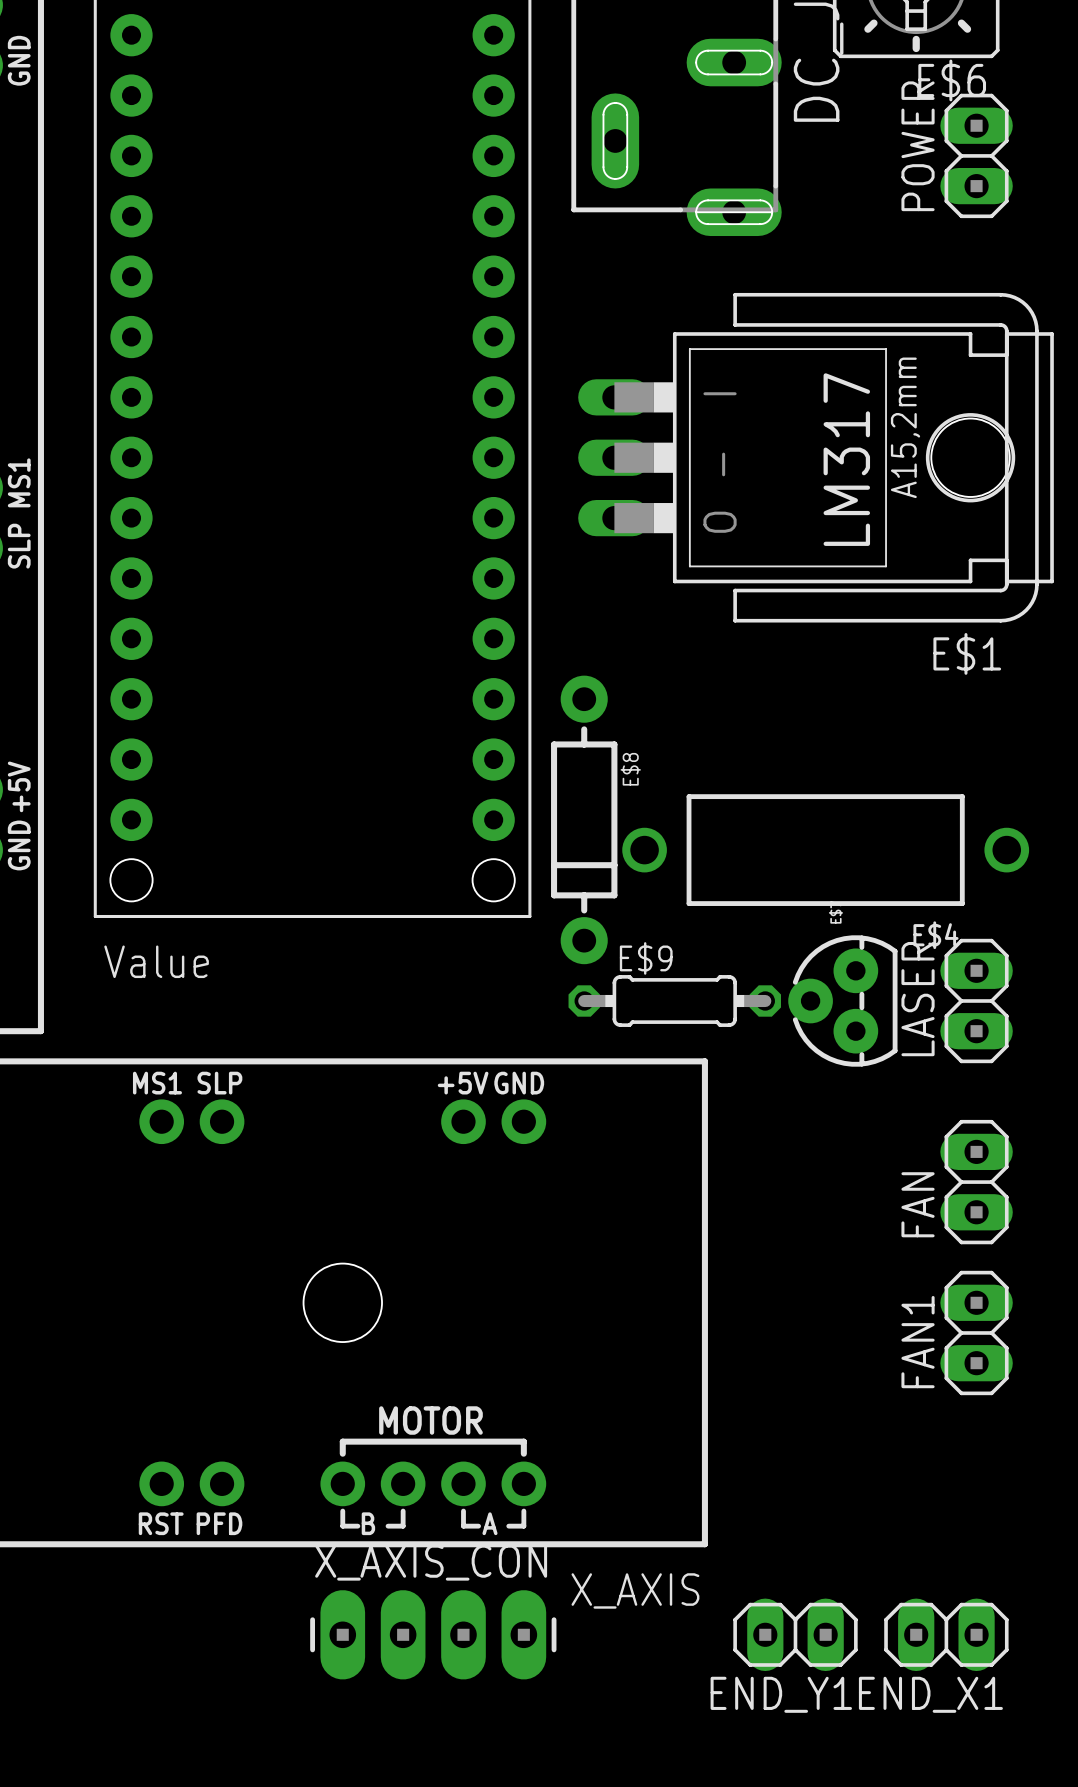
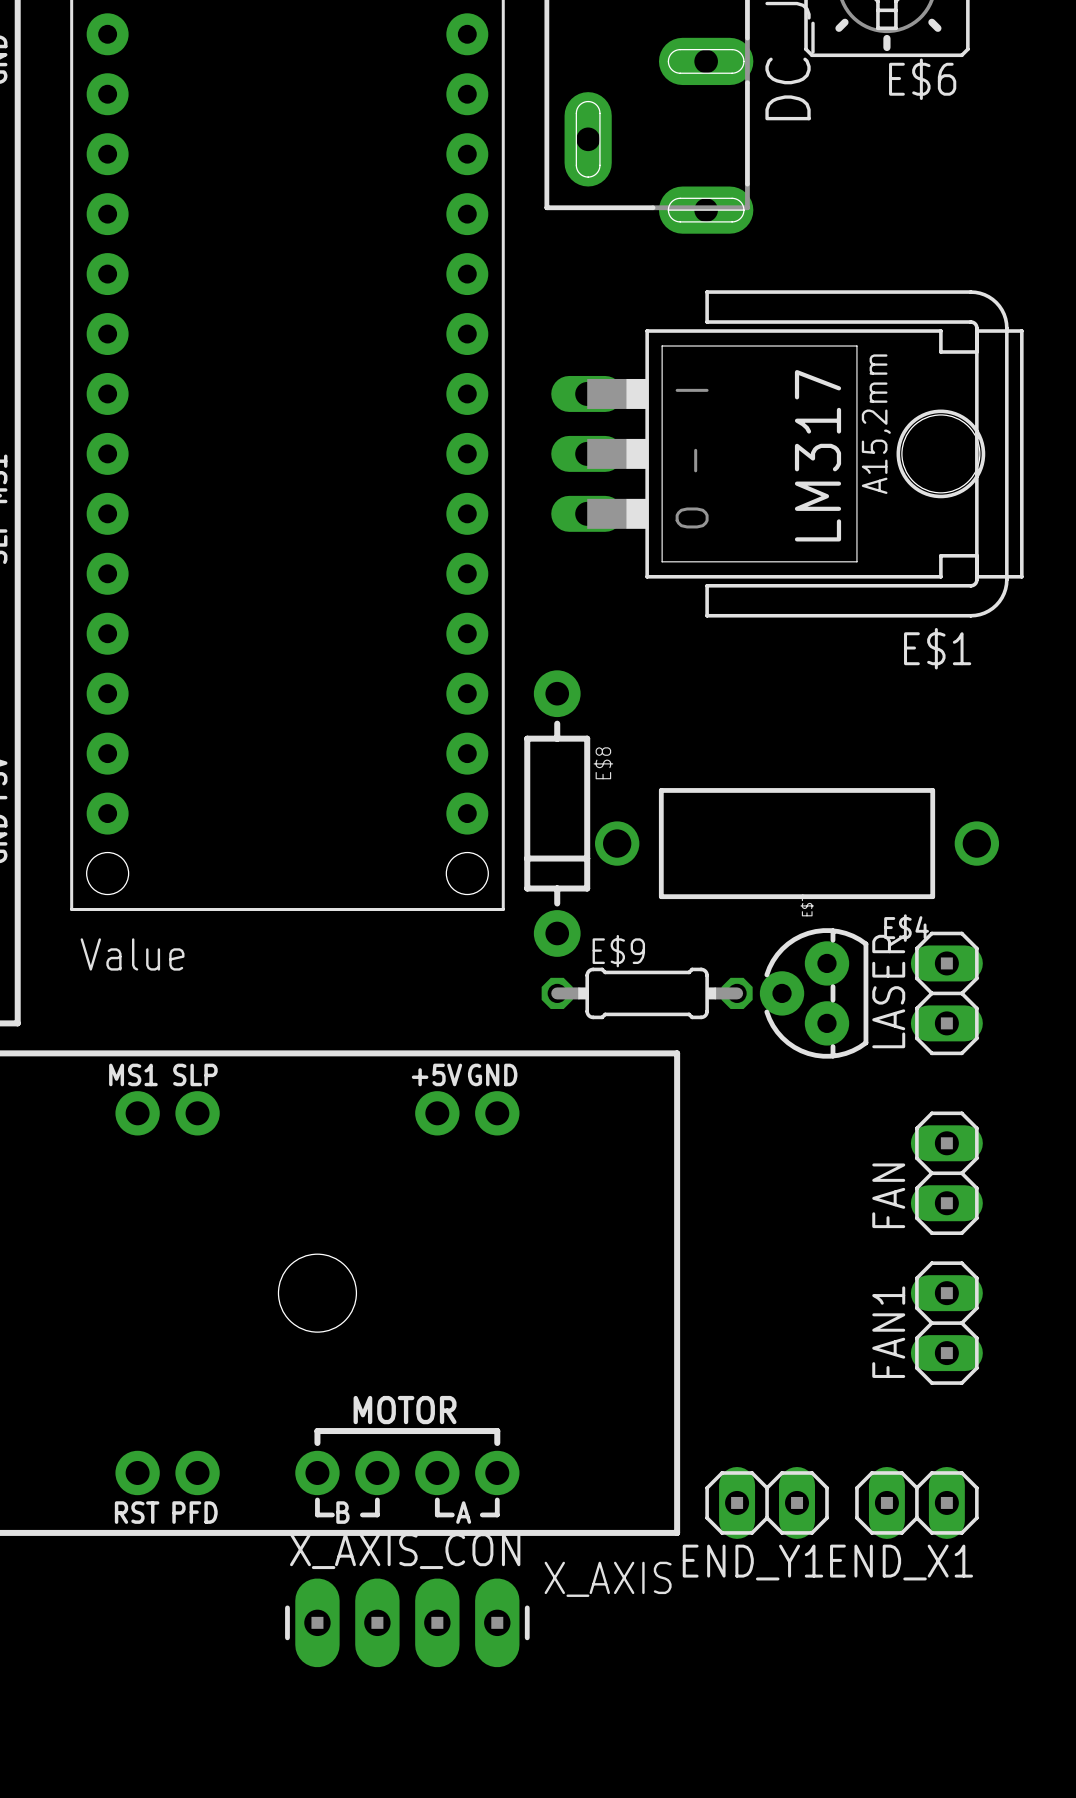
POWER: (976, 155) -> none
END_Y1 position: (795, 1634) -> (767, 1502)
END_X1 position: (946, 1634) -> (916, 1502)

